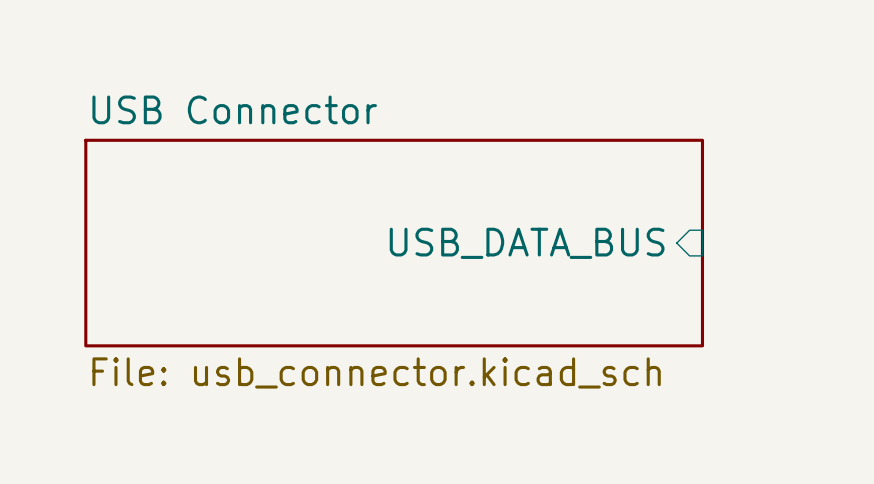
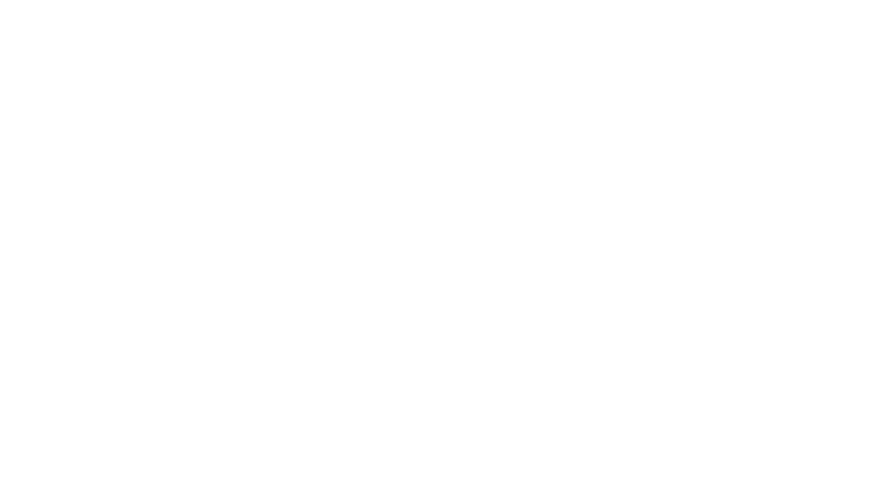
sheet USB Connector: File: usb_connector.kicad_sch (394, 243) -> none
sheet pin: USB_DATA_BUS (527, 243) -> none

